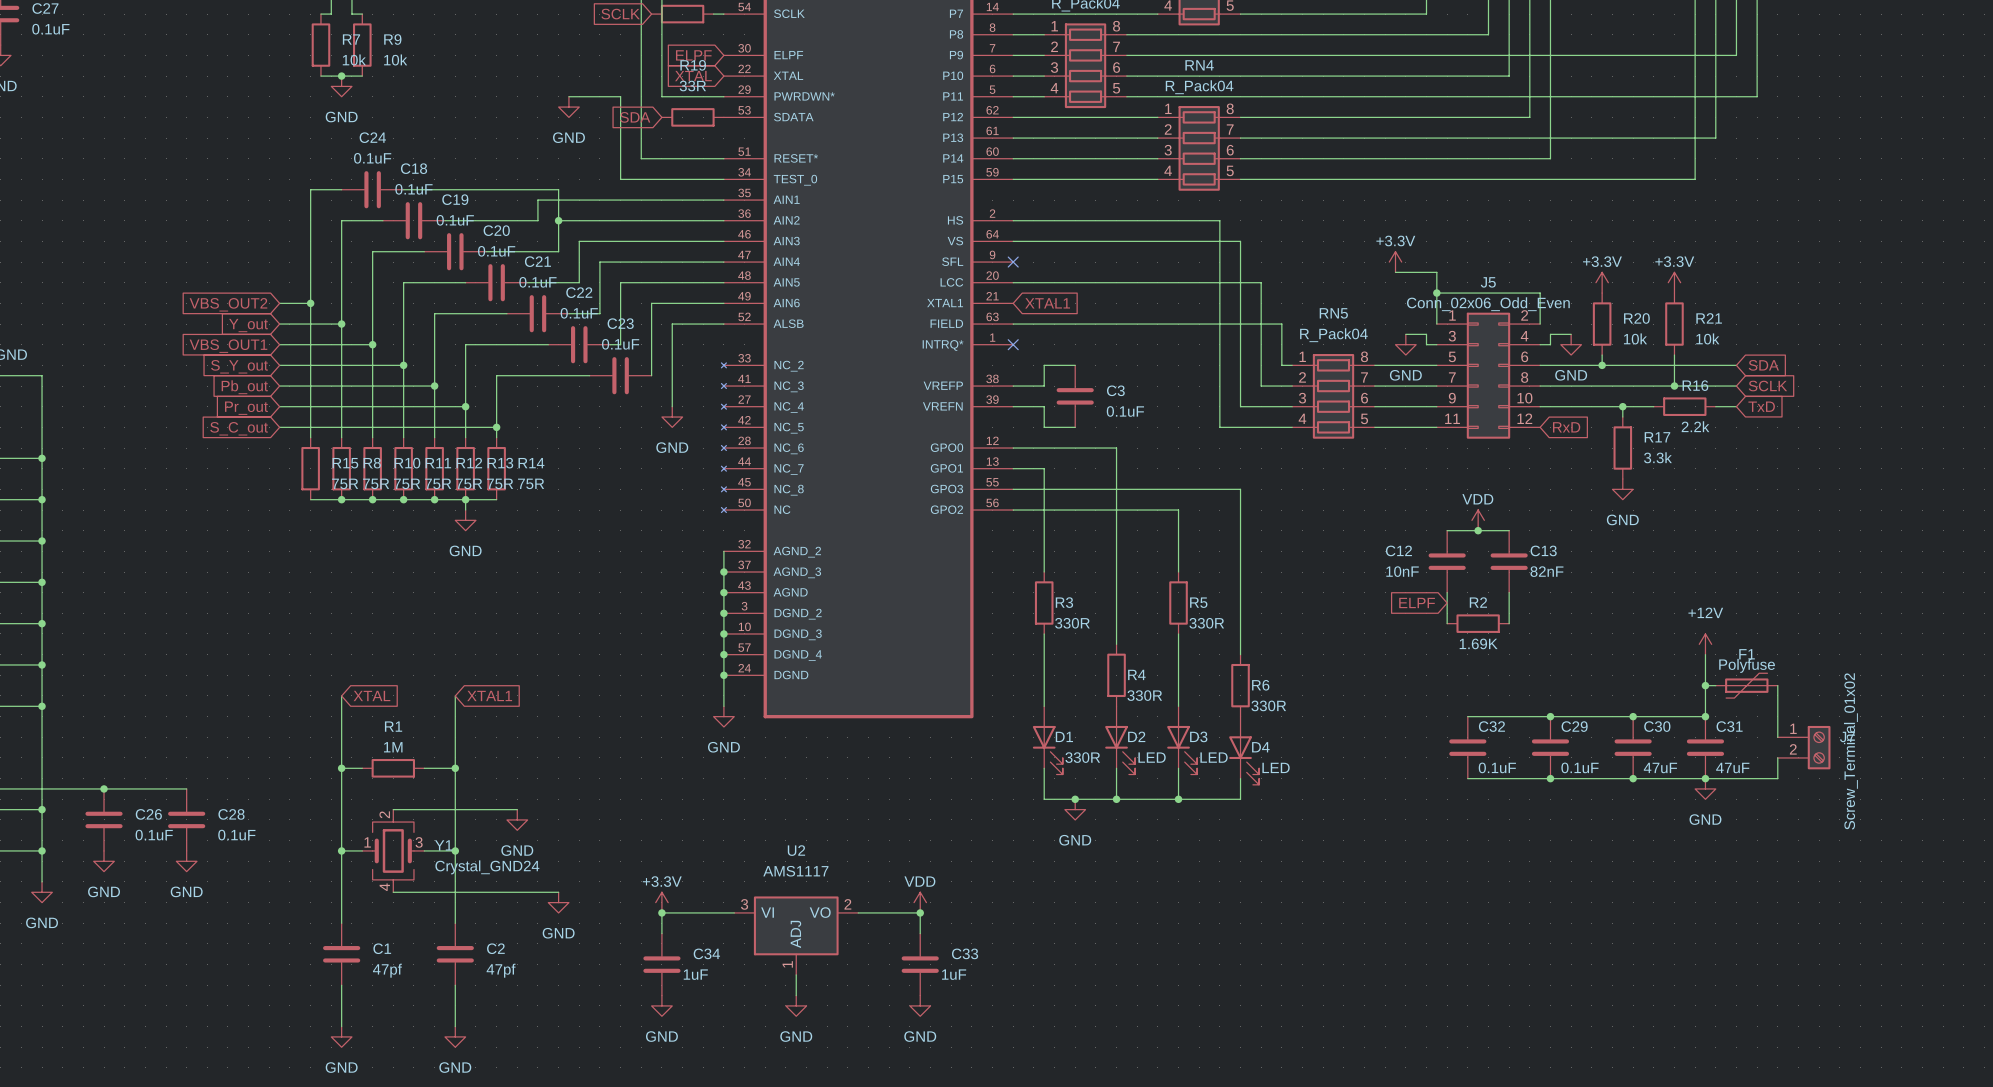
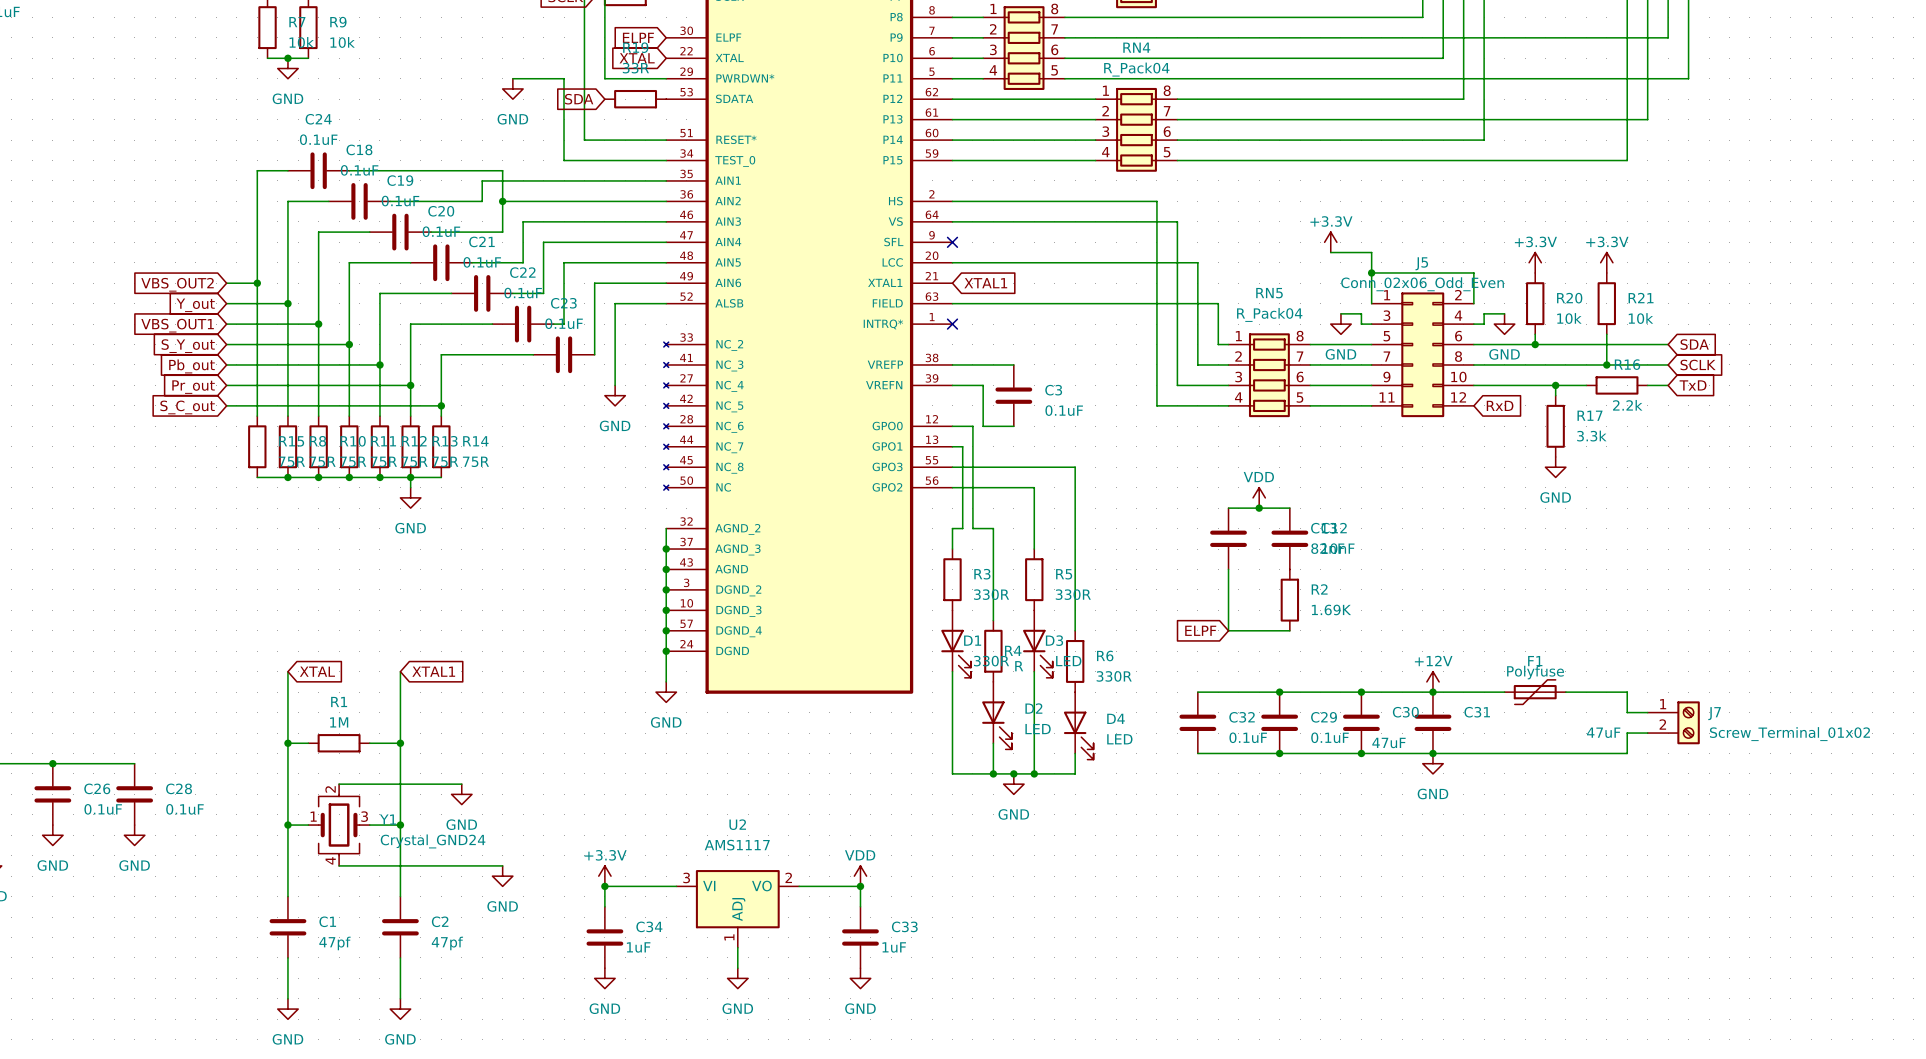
wire: (1075, 365) (1044, 365) (1044, 386) -> (1013, 364) (983, 364)
C3 position: (1075, 396) -> (1013, 395)
wire: (1044, 427) (1075, 427) -> none
wire: (1033, 448) (1044, 448) -> (983, 405) (983, 426)
wire: none -> (972, 426) (972, 528) (993, 528) (993, 620)
wire: (1075, 448) (1116, 448) (1116, 644) -> none
wire: (1023, 468) (1044, 468) (1044, 572) -> (962, 446) (962, 528) (952, 528) (952, 549)
wire: (1137, 489) (1240, 489) (1240, 654) -> (1075, 467) (1075, 630)
wire: (1095, 510) (1178, 510) (1178, 572) -> (1034, 487) (1034, 549)
power symbol position: VDD (1478, 520) -> VDD (1259, 497)
junction: none -> (1259, 508)
wire: (1447, 530) (1509, 530) -> (1228, 508) (1289, 508)
junction: (1478, 530) -> none
C12 position: (1447, 561) -> (1228, 538)
C13 position: (1509, 561) -> (1289, 538)
wire: none -> (1228, 569) (1228, 630) (1289, 630)
wire: (1447, 592) (1447, 623) -> none
wire: (1509, 592) (1509, 623) -> none
R3 position: (1044, 602) -> (952, 579)
R3 name position: R3 (1064, 602) -> R3 (982, 574)
R5 position: (1178, 602) -> (1034, 579)
R5 name position: R5 (1198, 602) -> R5 (1064, 574)
global label position: ELPF (1417, 602) -> ELPF (1200, 630)
R2 name position: R2 (1478, 602) -> R2 (1319, 589)
R3 value position: 330R (1072, 623) -> 330R (991, 594)
R5 value position: 330R (1206, 623) -> 330R (1073, 594)
R2 rotation: 0° (1478, 623) -> 90° clockwise (1289, 600)
R2 position: (1478, 623) -> (1289, 600)
wire: (1044, 633) (1044, 706) -> none
wire: (1178, 633) (1178, 706) -> none
R2 value position: 1.69K (1478, 643) -> 1.69K (1331, 609)
power symbol: +12V (1705, 644) -> none
wire: (1705, 654) (1705, 716) (1695, 716) -> (1647, 712) (1627, 712) (1627, 692)
R4 position: (1116, 675) -> (993, 651)
R6 position: (1240, 685) -> (1075, 661)
R6 name position: R6 (1260, 685) -> R6 (1105, 655)
wire: (1705, 685) (1715, 685) -> none
junction: (1705, 685) -> none
F1 position: (1746, 685) -> (1535, 692)
wire: (1777, 685) (1777, 737) -> none
wire: none -> (1034, 671) (1034, 773)
R4 value: 330R (1144, 695) -> R (1019, 666)
R6 value position: 330R (1268, 705) -> 330R (1114, 676)
power symbol: none -> +12V (1432, 681)
wire: none -> (1197, 692) (1402, 692)
junction: none -> (1279, 692)
junction: none -> (1361, 692)
junction: none -> (1432, 692)
junction: (1550, 716) -> none
junction: (1633, 716) -> none
junction: (1705, 716) -> none
C32 name position: C32 (1491, 726) -> C32 (1242, 717)
C29 name position: C29 (1574, 726) -> C29 (1324, 717)
C30 name position: C30 (1657, 726) -> C30 (1405, 712)
C31 name position: C31 (1729, 726) -> C31 (1477, 712)
D2 name position: D2 (1136, 736) -> D2 (1033, 708)
D1 position: (1047, 740) -> (956, 644)
D2 position: (1120, 740) -> (996, 715)
D3 position: (1182, 740) -> (1037, 644)
D4 name position: D4 (1260, 747) -> D4 (1115, 718)
C32 position: (1467, 747) -> (1197, 722)
C29 position: (1550, 747) -> (1279, 722)
C30 position: (1633, 747) -> (1361, 722)
C31 position: (1705, 747) -> (1432, 722)
J7 position: (1804, 747) -> (1673, 722)
D4 position: (1244, 750) -> (1078, 725)
J7 value rotation: 0° (1850, 751) -> 90° clockwise (1789, 734)
D2 value position: LED (1152, 757) -> LED (1038, 729)
wire: (1777, 757) (1777, 778) (1695, 778) -> (1647, 733) (1627, 733) (1627, 753)
D4 value position: LED (1276, 767) -> LED (1119, 739)
C32 value position: 0.1uF (1497, 767) -> 0.1uF (1248, 737)
C29 value position: 0.1uF (1580, 767) -> 0.1uF (1329, 737)
C31 value position: 47uF (1732, 767) -> 47uF (1603, 732)
wire: (1044, 768) (1044, 799) -> (952, 671) (952, 773) (983, 773)
wire: (1116, 768) (1116, 799) -> (993, 743) (993, 773)
wire: (1178, 768) (1178, 799) -> none
wire: (1240, 778) (1240, 799) (1137, 799) -> (1075, 753) (1075, 773)
wire: none -> (1197, 753) (1402, 753)
junction: none -> (1279, 753)
junction: none -> (1361, 753)
junction: none -> (1432, 753)
junction: (1550, 778) -> none
junction: (1633, 778) -> none
junction: (1705, 778) -> none
power symbol: none -> GND (1432, 763)
power symbol: GND (1705, 788) -> none
junction: none -> (993, 773)
junction position: (1116, 799) -> (1034, 773)
junction: (1178, 799) -> none

